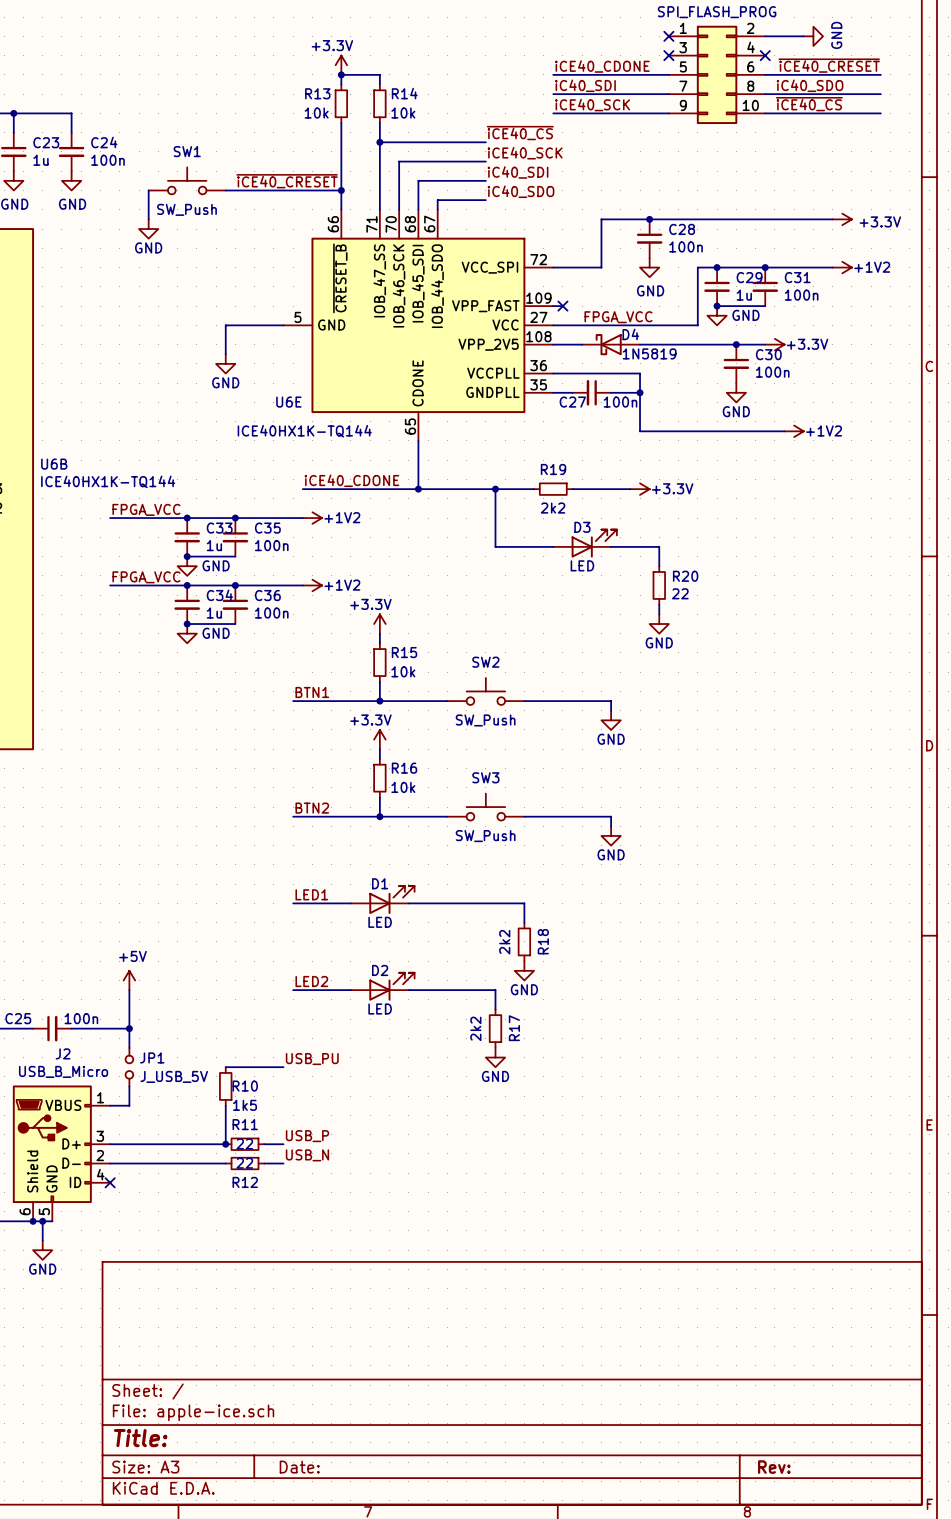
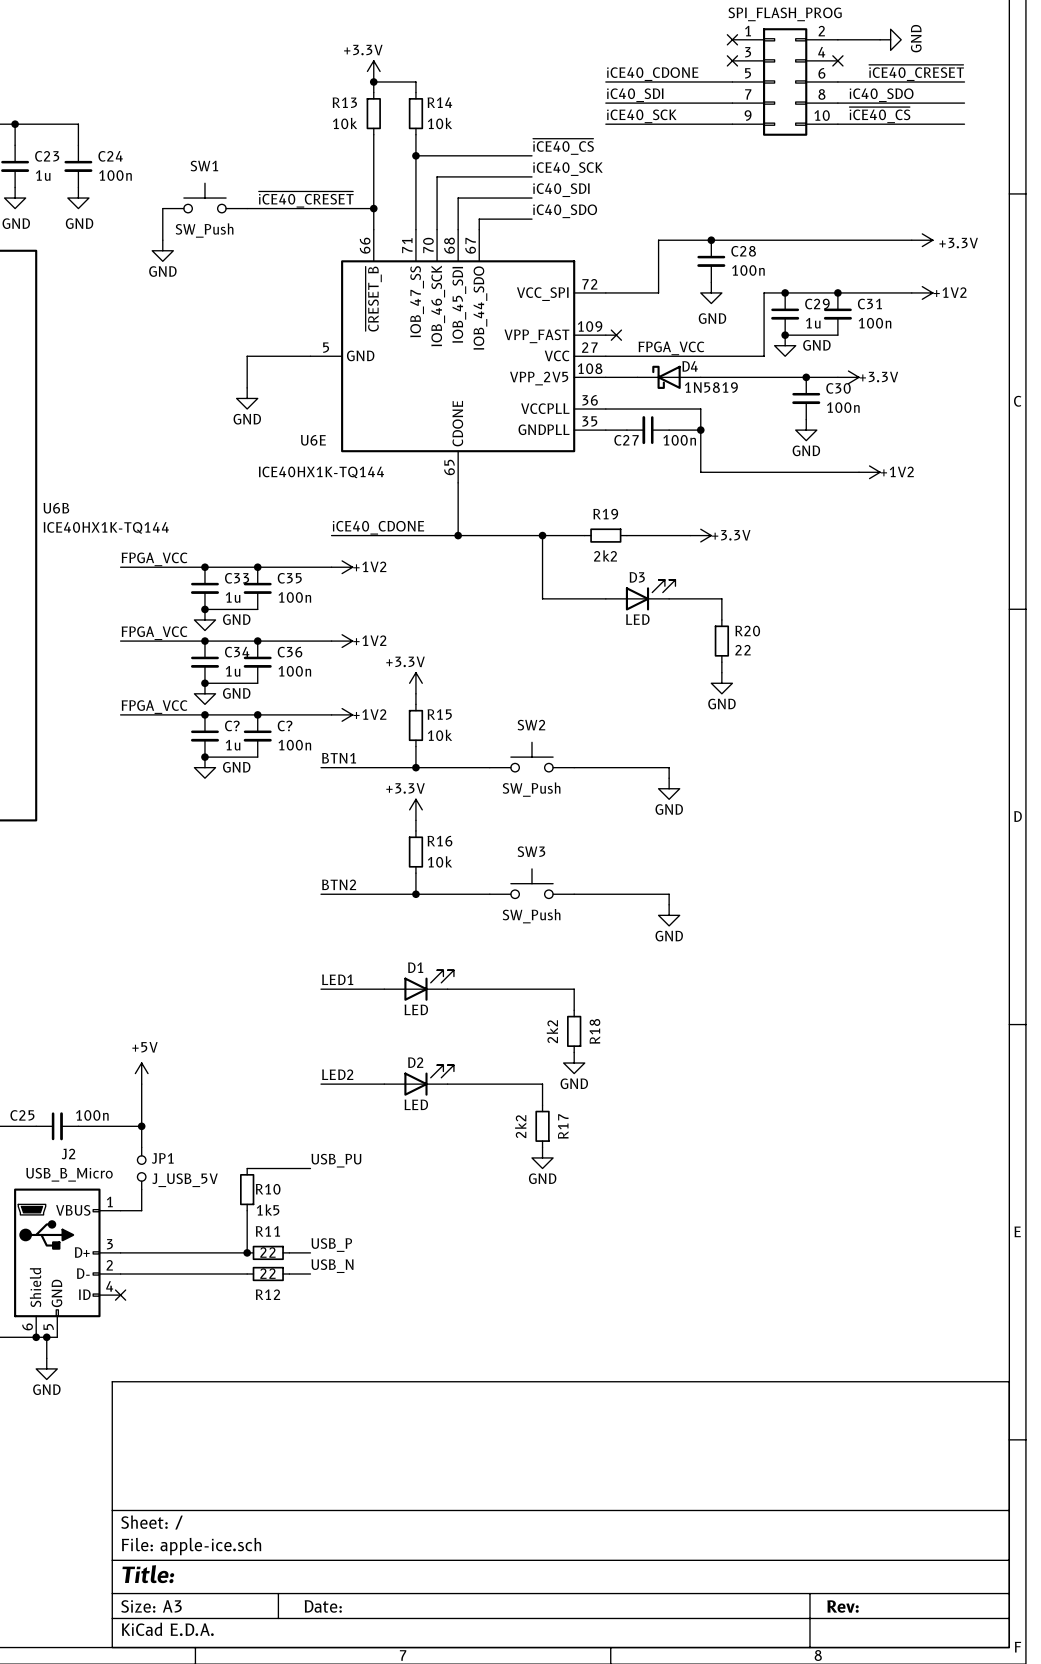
label: none -> FPGA_VCC (154, 707)
wire: none -> (120, 714) (331, 714)
junction: none -> (204, 714)
junction: none -> (257, 714)
power symbol: none -> +1V2 (342, 714)
C?: none -> 1u (204, 736)
C?: none -> 100n (257, 736)
wire: none -> (204, 757) (257, 757)
junction: none -> (204, 757)
power symbol: none -> GND (204, 767)

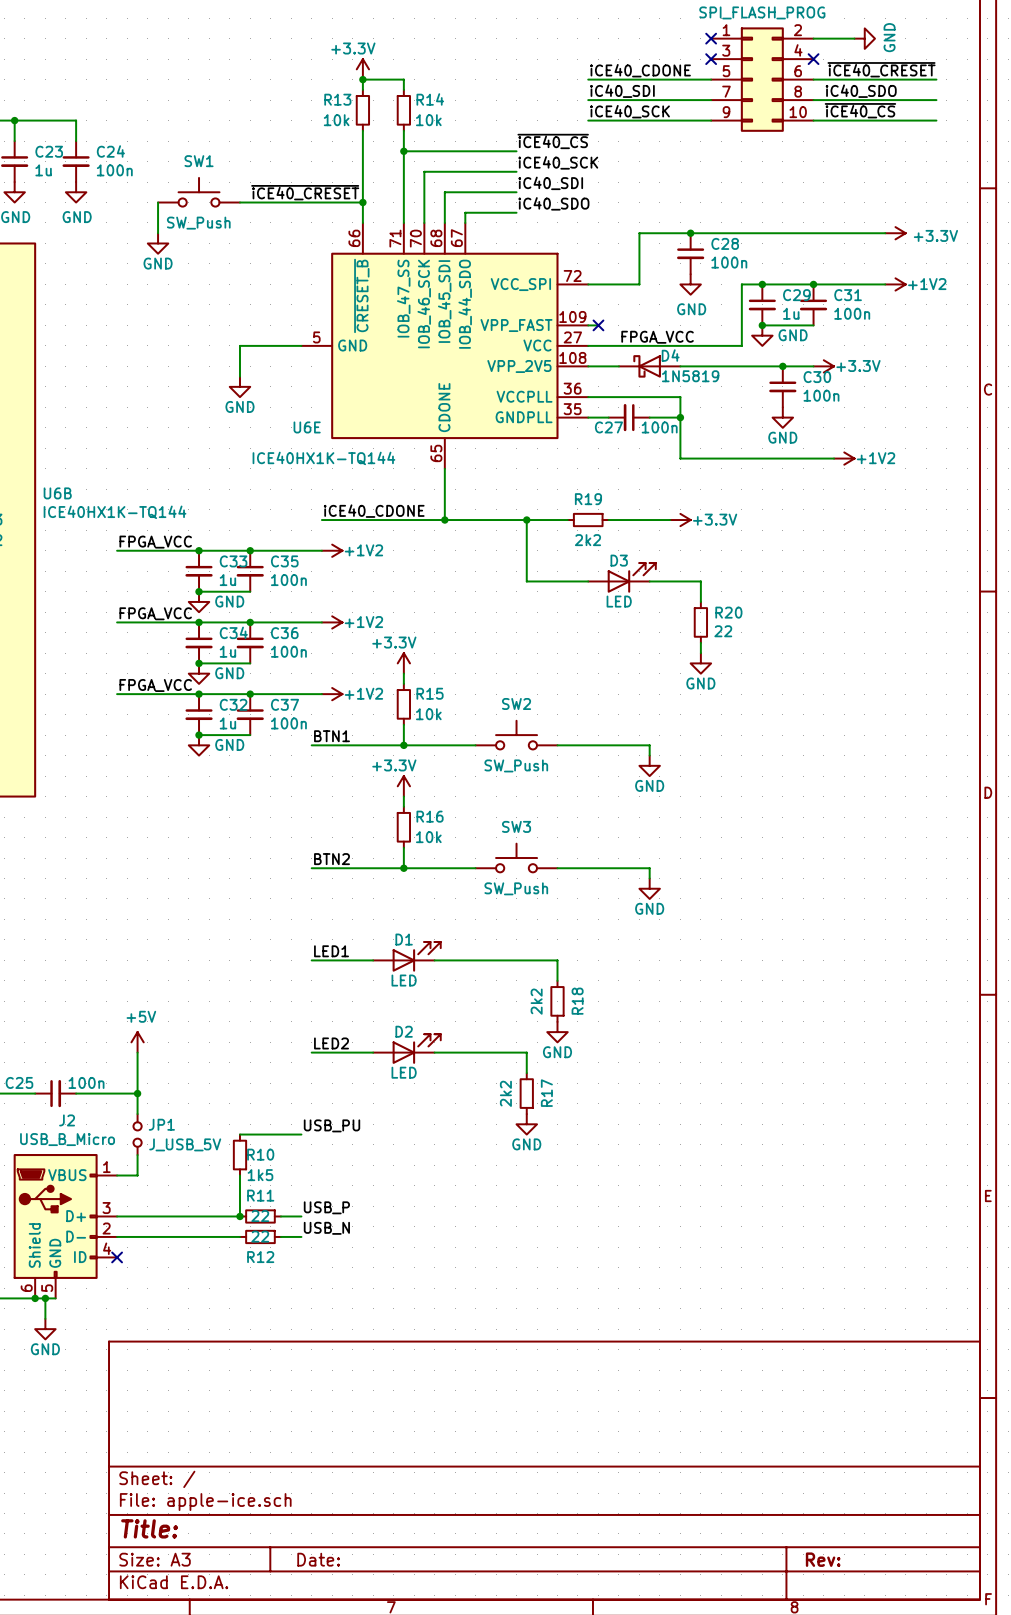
C? name: C? (232, 725) -> C32 (233, 704)
C? name: C? (285, 725) -> C37 (285, 704)

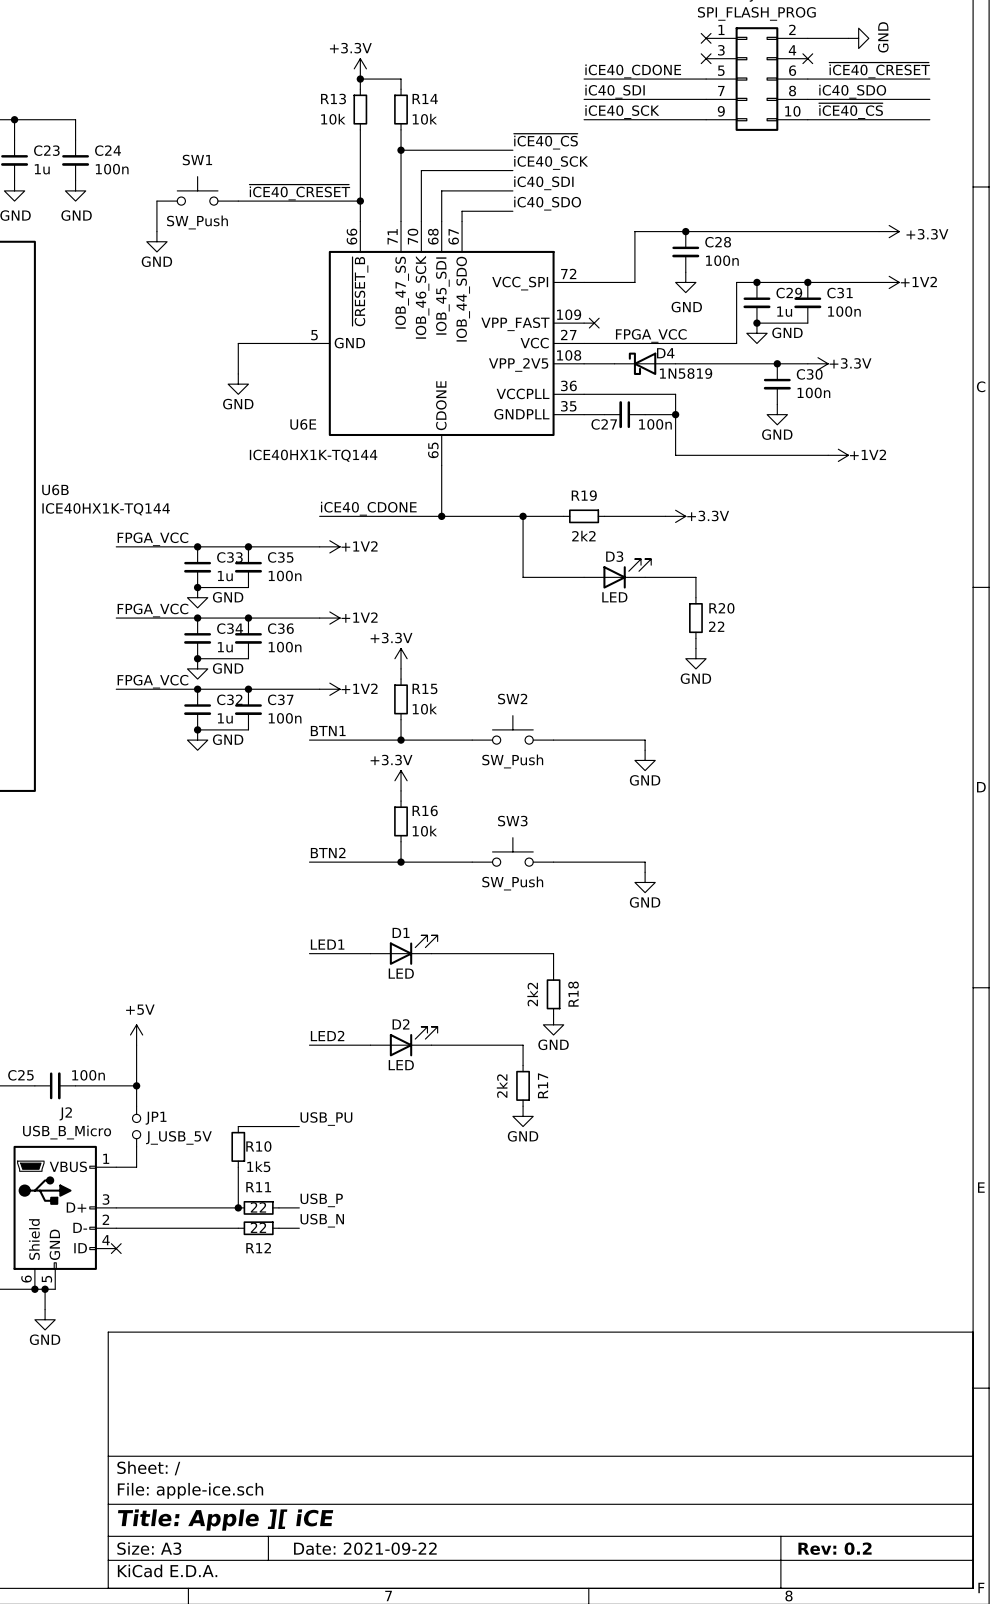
title block: Title: (149, 1528) -> Title: Apple ][ iCE (225, 1520)
title block: Date: (318, 1559) -> Date: 2021-09-22 (365, 1548)
title block: Rev: (823, 1559) -> Rev: 0.2 (835, 1548)

